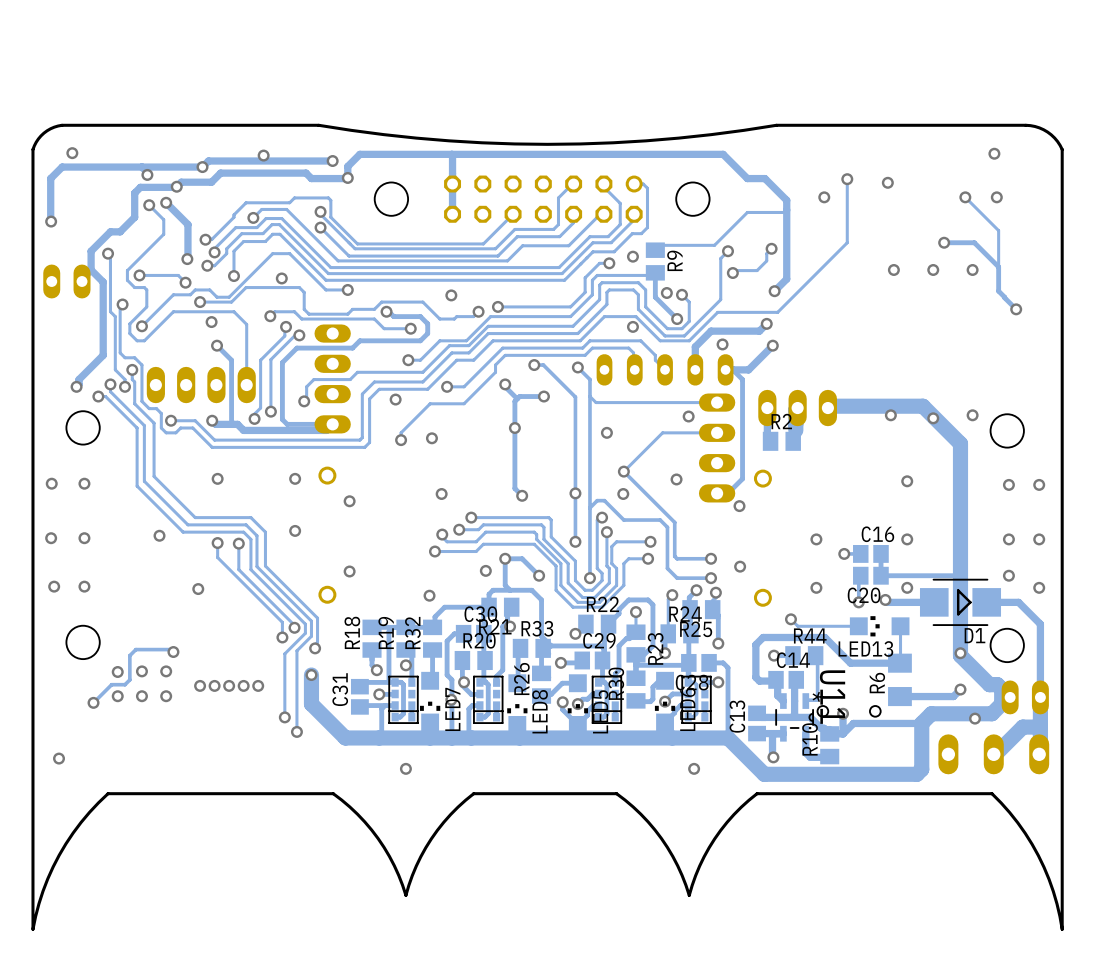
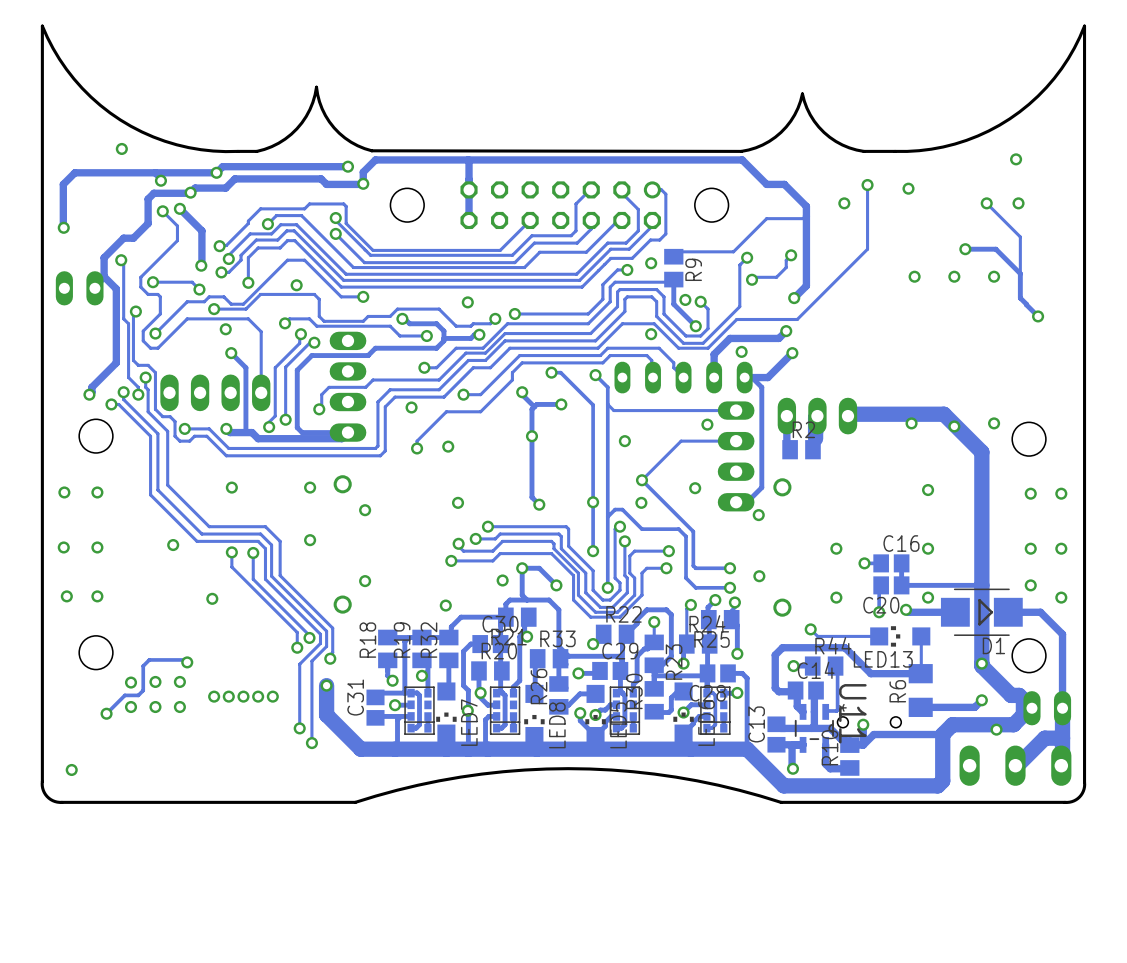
board edge: (1062, 149) (1057, 141) (1047, 132) (1039, 127) (1025, 125) (776, 125) (678, 138) (613, 142) (547, 144) (481, 142) (416, 138) (318, 125) (62, 125) (43, 133) (32, 149) (32, 929) (43, 891) (59, 855) (81, 822) (108, 793) (333, 793) (357, 814) (378, 838) (394, 865) (405, 895) (416, 866) (431, 838) (450, 814) (473, 793) (616, 793) (640, 814) (661, 838) (677, 865) (689, 895) (699, 866) (714, 838) (734, 814) (757, 793) (991, 793) (1017, 822) (1038, 855) (1053, 891) (1062, 929) (1062, 770) -> (1084, 155) (1084, 26) (1061, 68) (1029, 104) (988, 130) (954, 144) (931, 149) (863, 151) (842, 145) (829, 137) (814, 121) (806, 108) (802, 93) (794, 114) (781, 132) (762, 144) (741, 151) (371, 150) (351, 142) (334, 127) (322, 108) (316, 87) (312, 102) (306, 116) (296, 128) (285, 139) (271, 146) (256, 151) (225, 151) (200, 149) (164, 141) (141, 131) (120, 119) (100, 105) (74, 79) (59, 59) (42, 26) (42, 783) (44, 792) (50, 799) (59, 802) (355, 802) (396, 790) (460, 777) (546, 768) (589, 768) (654, 774) (718, 785) (781, 802) (1067, 802) (1076, 799) (1081, 795) (1084, 782)
via position: (72, 153) -> (121, 148)
via: (263, 155) -> none
track: none -> (479, 334) (474, 334) (470, 338) (443, 338)
via: none -> (479, 334)
via: (405, 768) -> none
via: (694, 768) -> none

